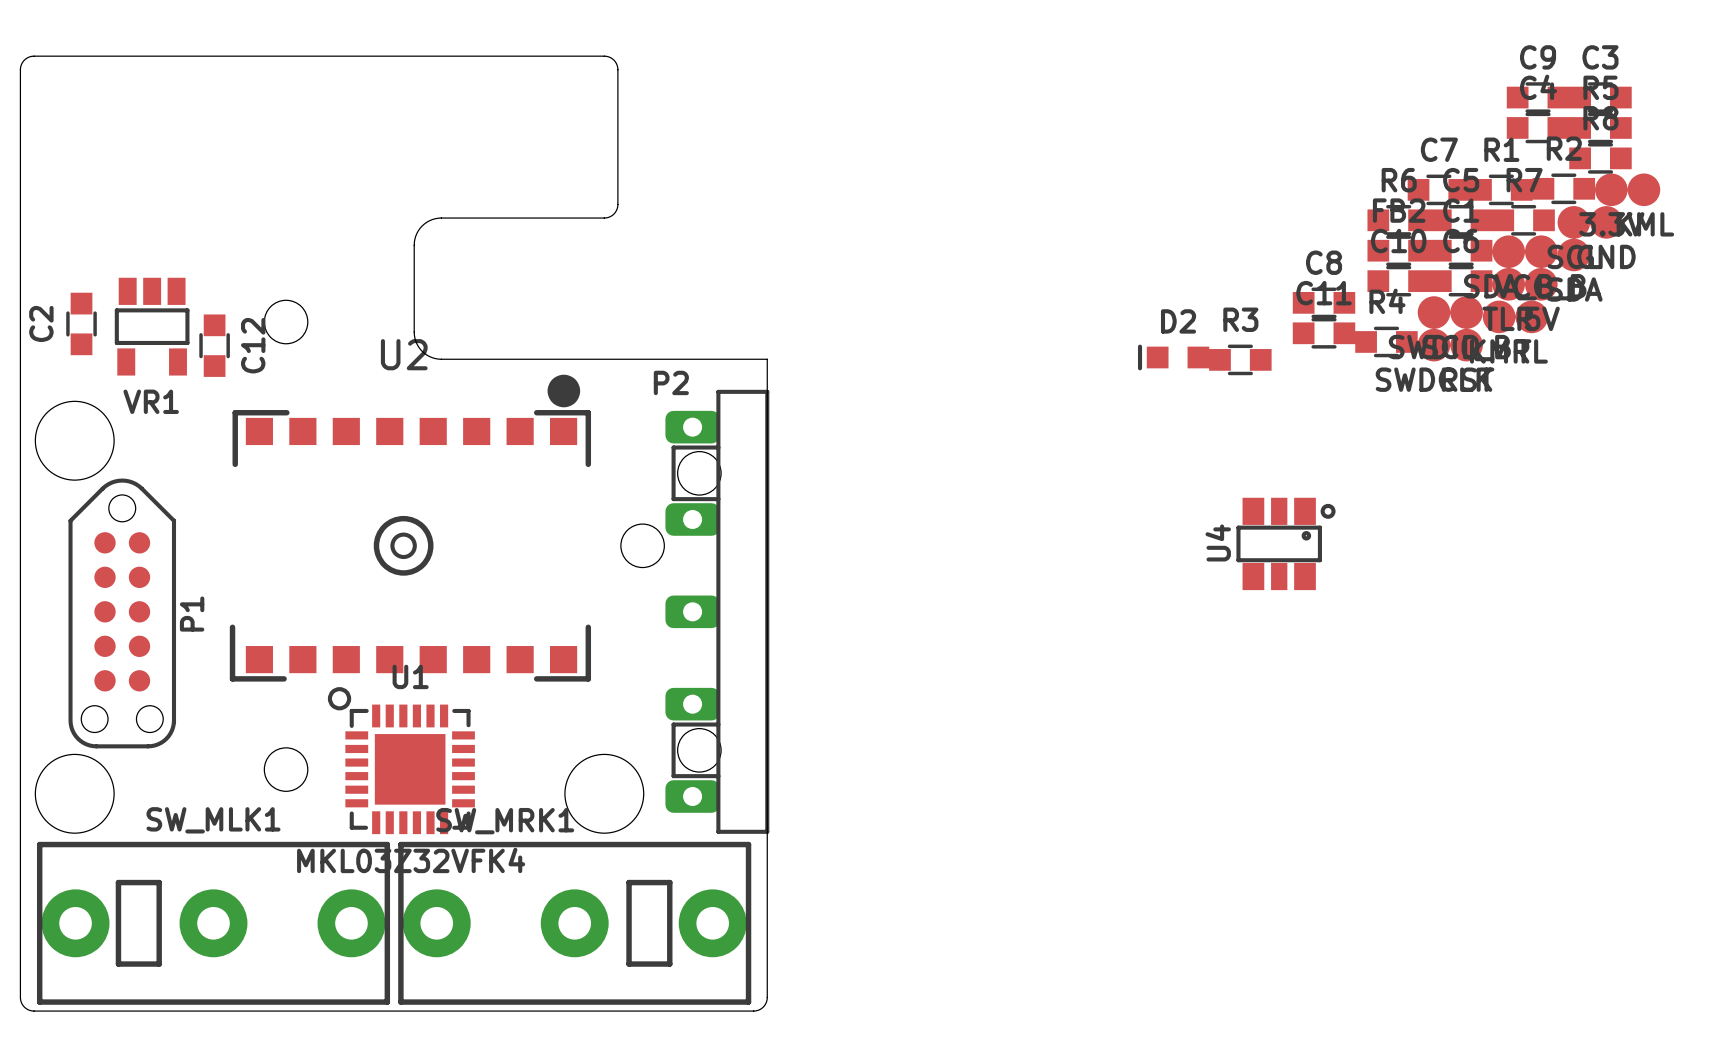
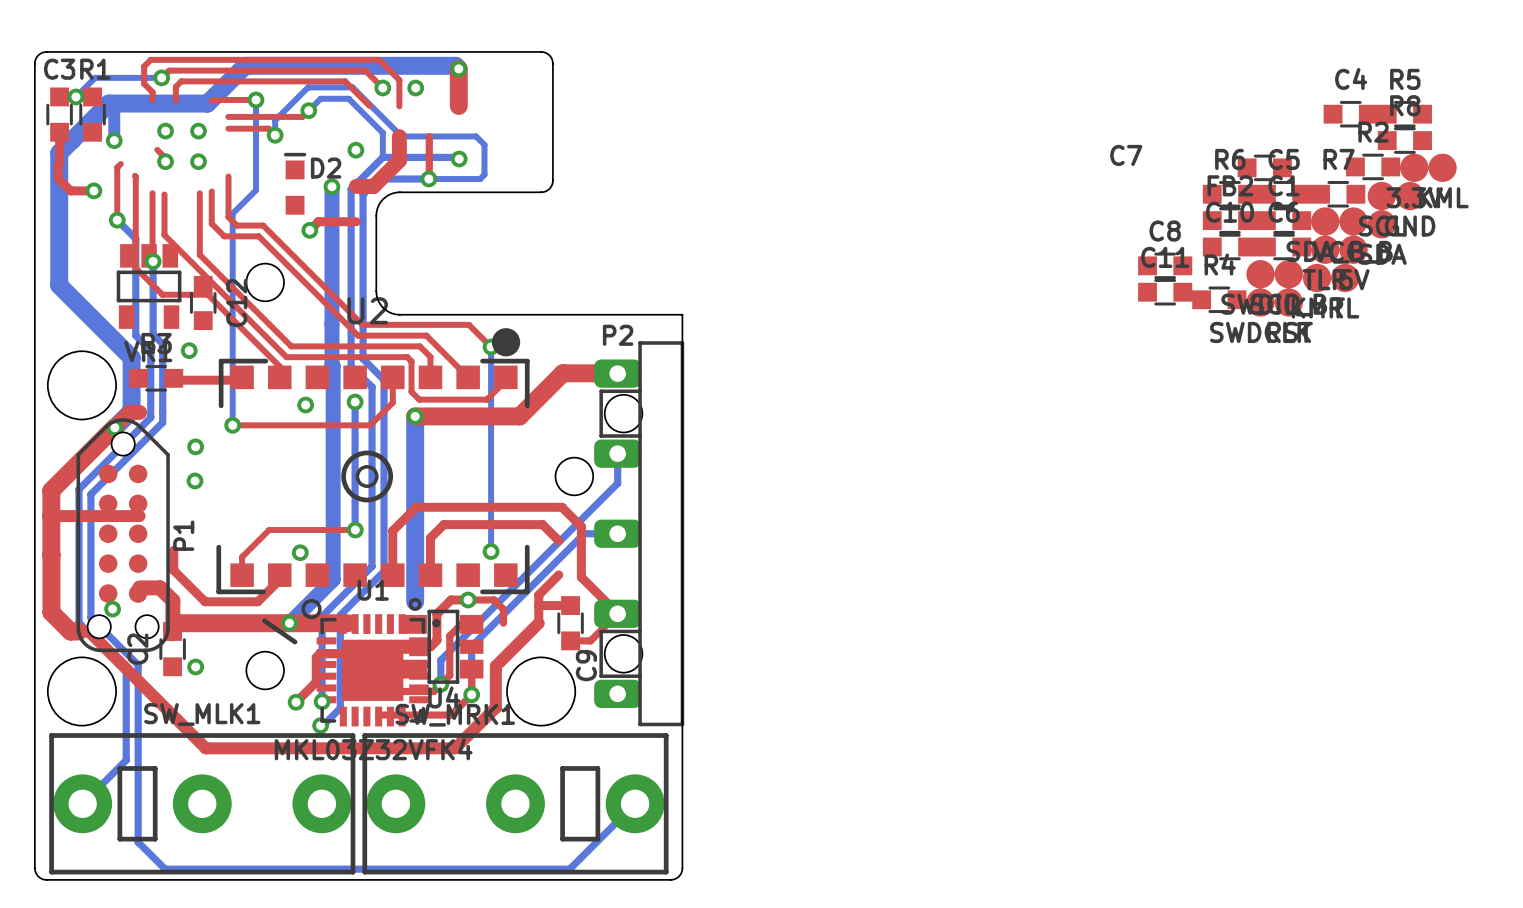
top track: none -> (458, 68) (458, 105)
bottom track: none -> (458, 68) (455, 65) (245, 65) (207, 103) (108, 103) (59, 153) (59, 285) (131, 357) (131, 410) (114, 427)
via: none -> (458, 68)
top track: none -> (161, 78) (169, 70) (365, 70) (382, 88)
bottom track: none -> (161, 77) (95, 77) (75, 96)
via: none -> (161, 77)
via: none -> (382, 88)
via: none -> (415, 88)
C9 rotation: 0° (1538, 97) -> 90° clockwise (570, 623)
C9 position: (1538, 97) -> (570, 623)
C3 rotation: 0° (1600, 97) -> 90° clockwise (59, 114)
C3 position: (1600, 97) -> (59, 114)
via: none -> (75, 96)
top track: none -> (152, 100) (152, 92) (144, 83) (144, 66) (150, 59) (379, 59) (399, 80) (399, 106)
top track: none -> (256, 99) (211, 100)
bottom track: none -> (256, 99) (256, 190) (232, 213) (232, 425)
via: none -> (256, 99)
top track: none -> (175, 101) (175, 86) (181, 81) (345, 81) (369, 105)
bottom track: none -> (113, 103) (114, 140)
top track: none -> (309, 110) (302, 116) (228, 116)
bottom track: none -> (308, 110) (320, 98) (348, 98) (382, 132) (382, 157)
via: none -> (308, 110)
top track: none -> (228, 128) (268, 128) (275, 135)
via: none -> (165, 131)
via: none -> (198, 131)
top track: none -> (59, 132) (58, 178) (70, 190) (93, 190)
C7 name position: C7 (1439, 149) -> C7 (1126, 155)
bottom track: none -> (275, 135) (275, 120) (308, 87) (352, 87) (401, 136) (476, 136) (484, 144) (484, 174) (480, 179) (378, 179) (363, 194) (363, 358) (384, 379) (384, 571) (340, 615) (340, 708) (322, 725) (320, 725)
via: none -> (275, 135)
top track: none -> (399, 136) (399, 160) (373, 186) (356, 186)
top track: none -> (429, 136) (428, 179)
via: none -> (114, 140)
top track: none -> (157, 149) (166, 159)
via: none -> (355, 150)
bottom track: none -> (382, 157) (457, 157) (459, 159)
bottom track: none -> (382, 157) (351, 189) (351, 366) (372, 387) (372, 566) (322, 616) (322, 701)
via: none -> (459, 159)
via: none -> (165, 161)
via: none -> (198, 161)
top track: none -> (120, 164) (117, 167) (117, 220)
R1 rotation: 0° (1501, 189) -> 90° clockwise (92, 114)
R1 position: (1501, 189) -> (92, 114)
top track: none -> (134, 175) (135, 267) (162, 294) (207, 294) (279, 366) (279, 377)
top track: none -> (228, 176) (228, 217) (236, 225) (263, 225) (362, 324) (468, 324) (491, 346)
via: none -> (428, 179)
bottom track: none -> (331, 186) (333, 579) (289, 623)
via: none -> (331, 186)
via: none -> (93, 190)
top track: none -> (211, 191) (211, 223) (224, 236) (258, 236) (358, 335) (426, 335) (468, 377)
top track: none -> (152, 193) (153, 261)
top track: none -> (199, 193) (199, 254) (291, 346) (419, 346) (430, 356) (430, 377)
top track: none -> (164, 194) (164, 235) (286, 357) (407, 357) (411, 361) (411, 391) (419, 399) (486, 399) (505, 380) (505, 377)
bottom track: none -> (117, 220) (135, 238) (135, 335) (150, 350) (150, 417) (78, 489) (78, 622) (126, 669) (126, 760) (82, 803)
via: none -> (117, 220)
top track: none -> (356, 221) (318, 221) (309, 230)
via: none -> (309, 230)
bottom track: none -> (153, 261) (153, 334) (162, 344) (162, 422) (90, 494) (90, 617) (138, 665) (138, 842) (165, 869) (569, 869) (635, 803)
via: none -> (153, 261)
C2 position: (81, 323) -> (172, 649)
D2 rotation: 0° (1173, 357) -> 90° clockwise (295, 183)
D2 position: (1173, 357) -> (295, 183)
R3 position: (1240, 359) -> (156, 378)
P2 name position: P2 (671, 382) -> P2 (618, 335)
bottom track: none -> (491, 346) (491, 551)
via: none -> (491, 346)
via: none -> (189, 350)
top track: none -> (617, 373) (562, 373) (519, 416) (415, 416)
top track: none -> (242, 377) (239, 380) (175, 380) (173, 378)
top track: none -> (392, 377) (392, 402) (370, 425) (232, 425)
bottom track: none -> (355, 402) (355, 529)
via: none -> (355, 402)
via: none -> (305, 405)
top track: none -> (139, 412) (129, 412) (51, 490) (51, 612) (70, 631) (88, 631) (205, 748) (455, 748) (495, 707) (495, 666) (538, 623) (538, 594) (558, 574)
bottom track: none -> (415, 416) (415, 601)
via: none -> (415, 416)
via: none -> (232, 425)
via: none -> (114, 427)
via: none -> (195, 446)
bottom track: none -> (617, 453) (617, 483) (440, 660) (440, 684)
U4 rotation: 0° (1285, 543) -> 90° counterclockwise (443, 640)
U4 position: (1285, 543) -> (443, 640)
via: none -> (195, 480)
top track: none -> (51, 516) (139, 516)
top track: none -> (355, 530) (269, 530) (242, 557) (242, 575)
via: none -> (355, 530)
bottom track: none -> (617, 533) (584, 533) (471, 646) (471, 694)
top track: none -> (558, 540) (542, 524) (443, 524) (430, 537) (430, 575)
top track: none -> (173, 550) (173, 570) (205, 601) (257, 601) (279, 579) (279, 575)
via: none -> (491, 551)
via: none -> (300, 552)
top track: none -> (392, 575) (392, 530) (416, 507) (561, 507) (581, 526) (581, 577) (617, 613)
top track: none -> (139, 587) (160, 587) (172, 600) (172, 628)
via: none -> (468, 599)
top track: none -> (570, 605) (538, 605)
via: none -> (112, 609)
top track: none -> (617, 613) (590, 640) (570, 640)
line: none -> (264, 620) (295, 642)
top track: none -> (181, 623) (348, 623)
via: none -> (289, 623)
top track: none -> (503, 623) (503, 609) (494, 599) (450, 599) (436, 614) (436, 640) (430, 646) (415, 646)
top track: none -> (471, 624) (461, 624) (449, 635) (449, 675) (433, 691) (390, 691) (383, 684)
top track: none -> (348, 653) (319, 653) (316, 657) (316, 682) (296, 702)
via: none -> (195, 666)
top track: none -> (471, 669) (471, 694) (451, 715) (383, 715)
via: none -> (440, 684)
via: none -> (471, 694)
via: none -> (322, 701)
via: none -> (296, 702)
via: none -> (320, 725)

